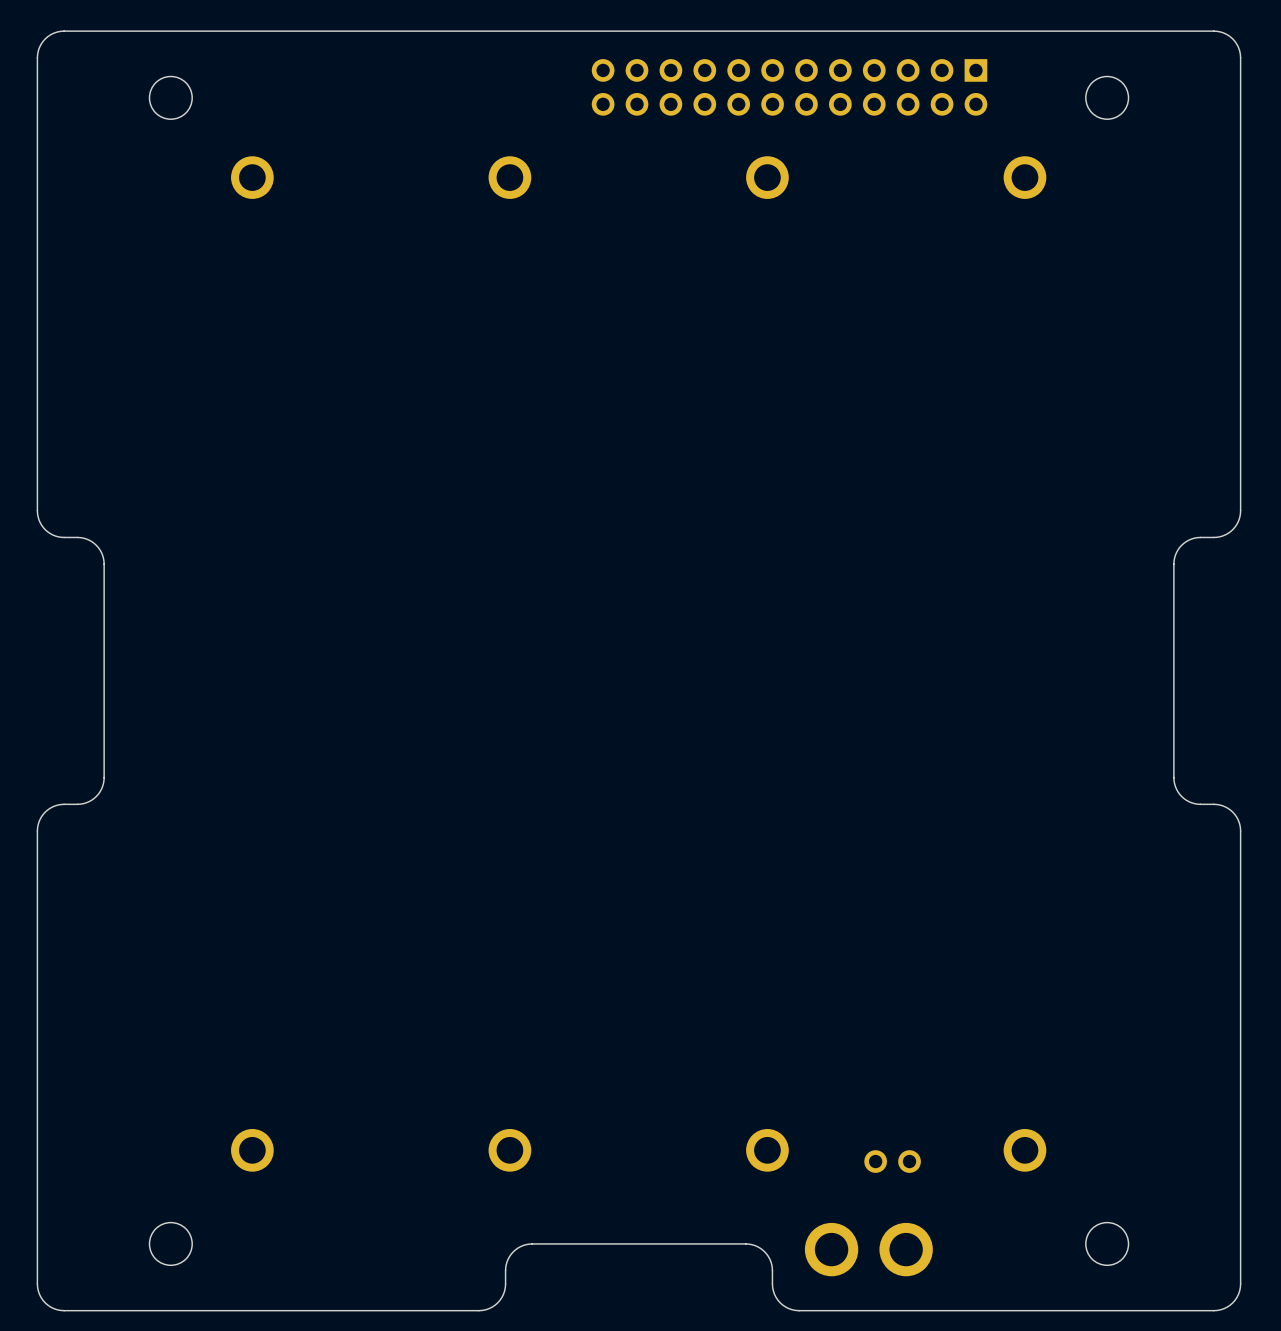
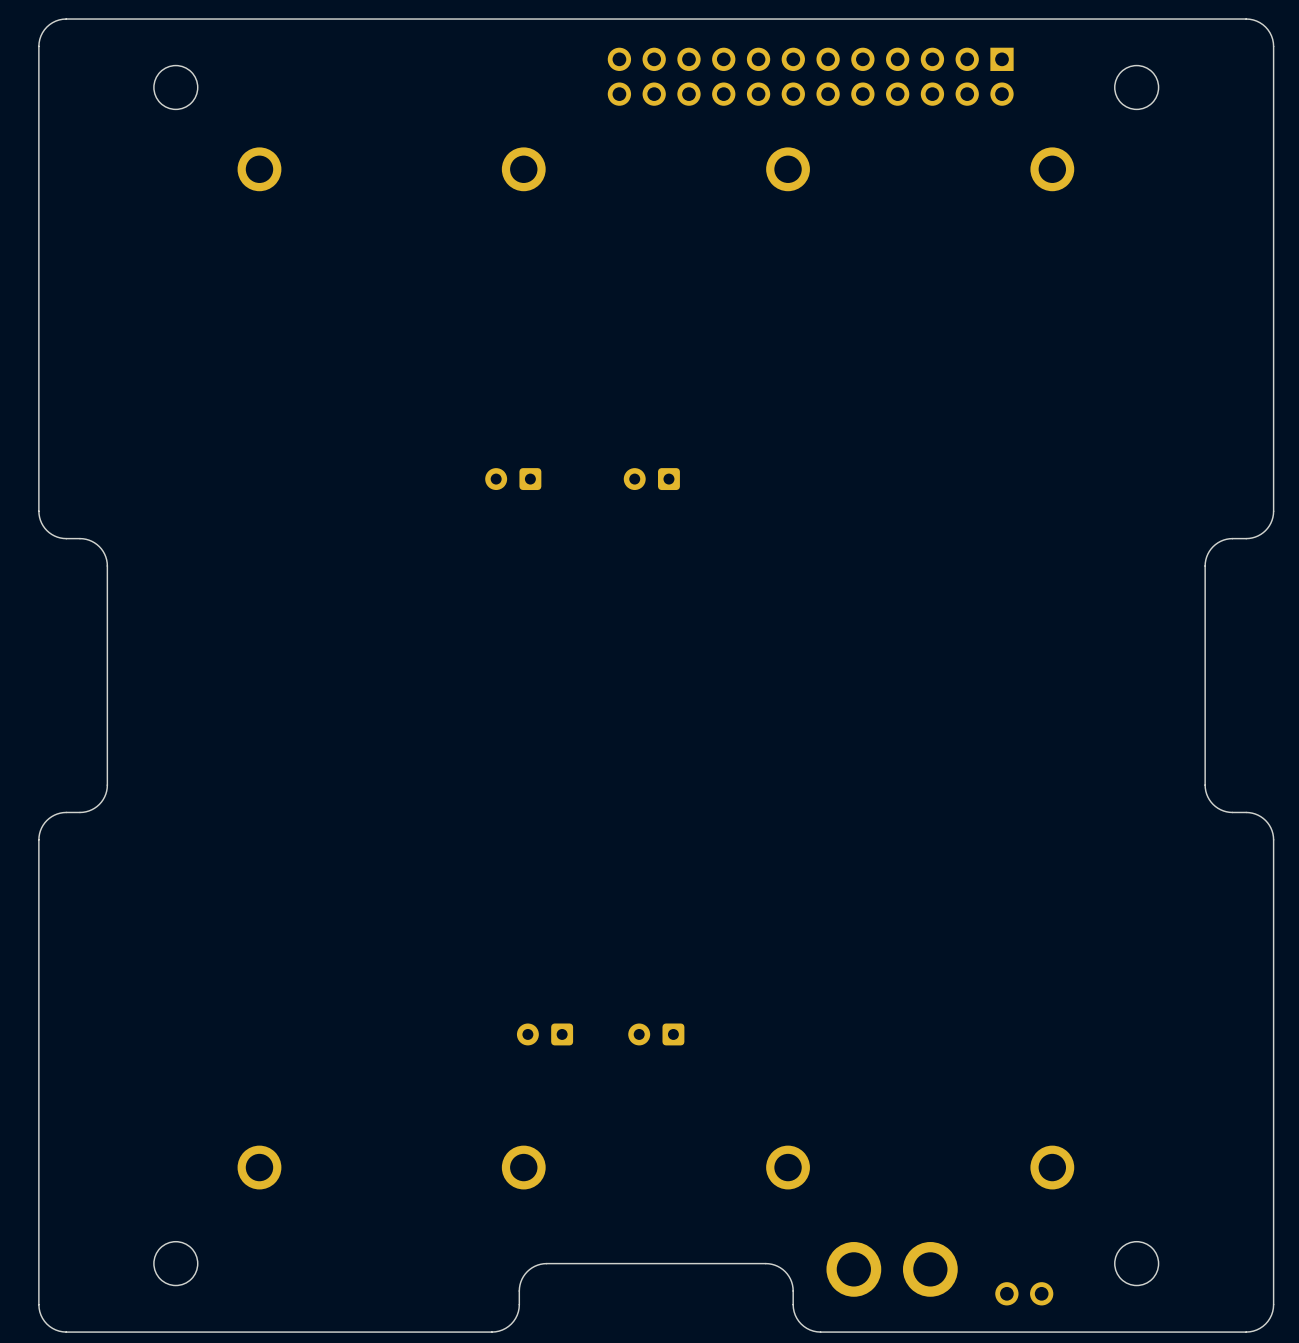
part: none -> (513, 479)
part: none -> (651, 479)
part: none -> (545, 1034)
part: none -> (656, 1034)
part position: (892, 1161) -> (1024, 1293)

